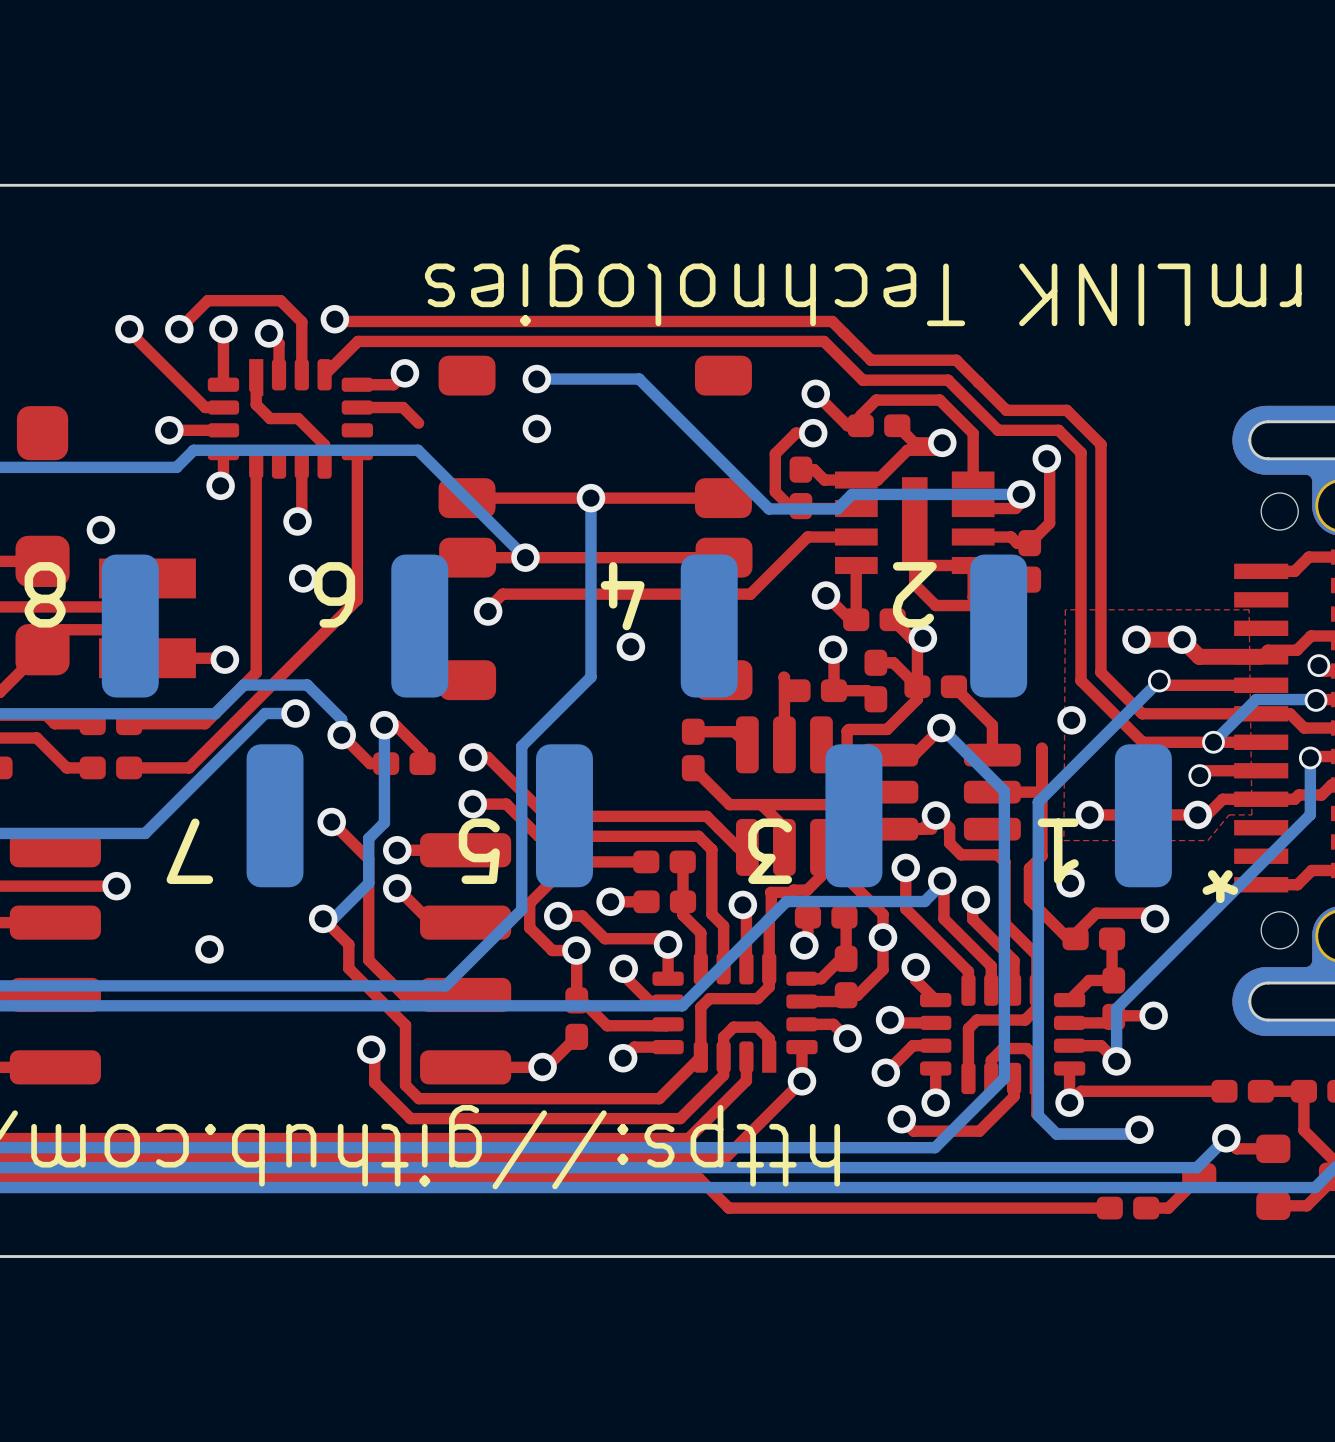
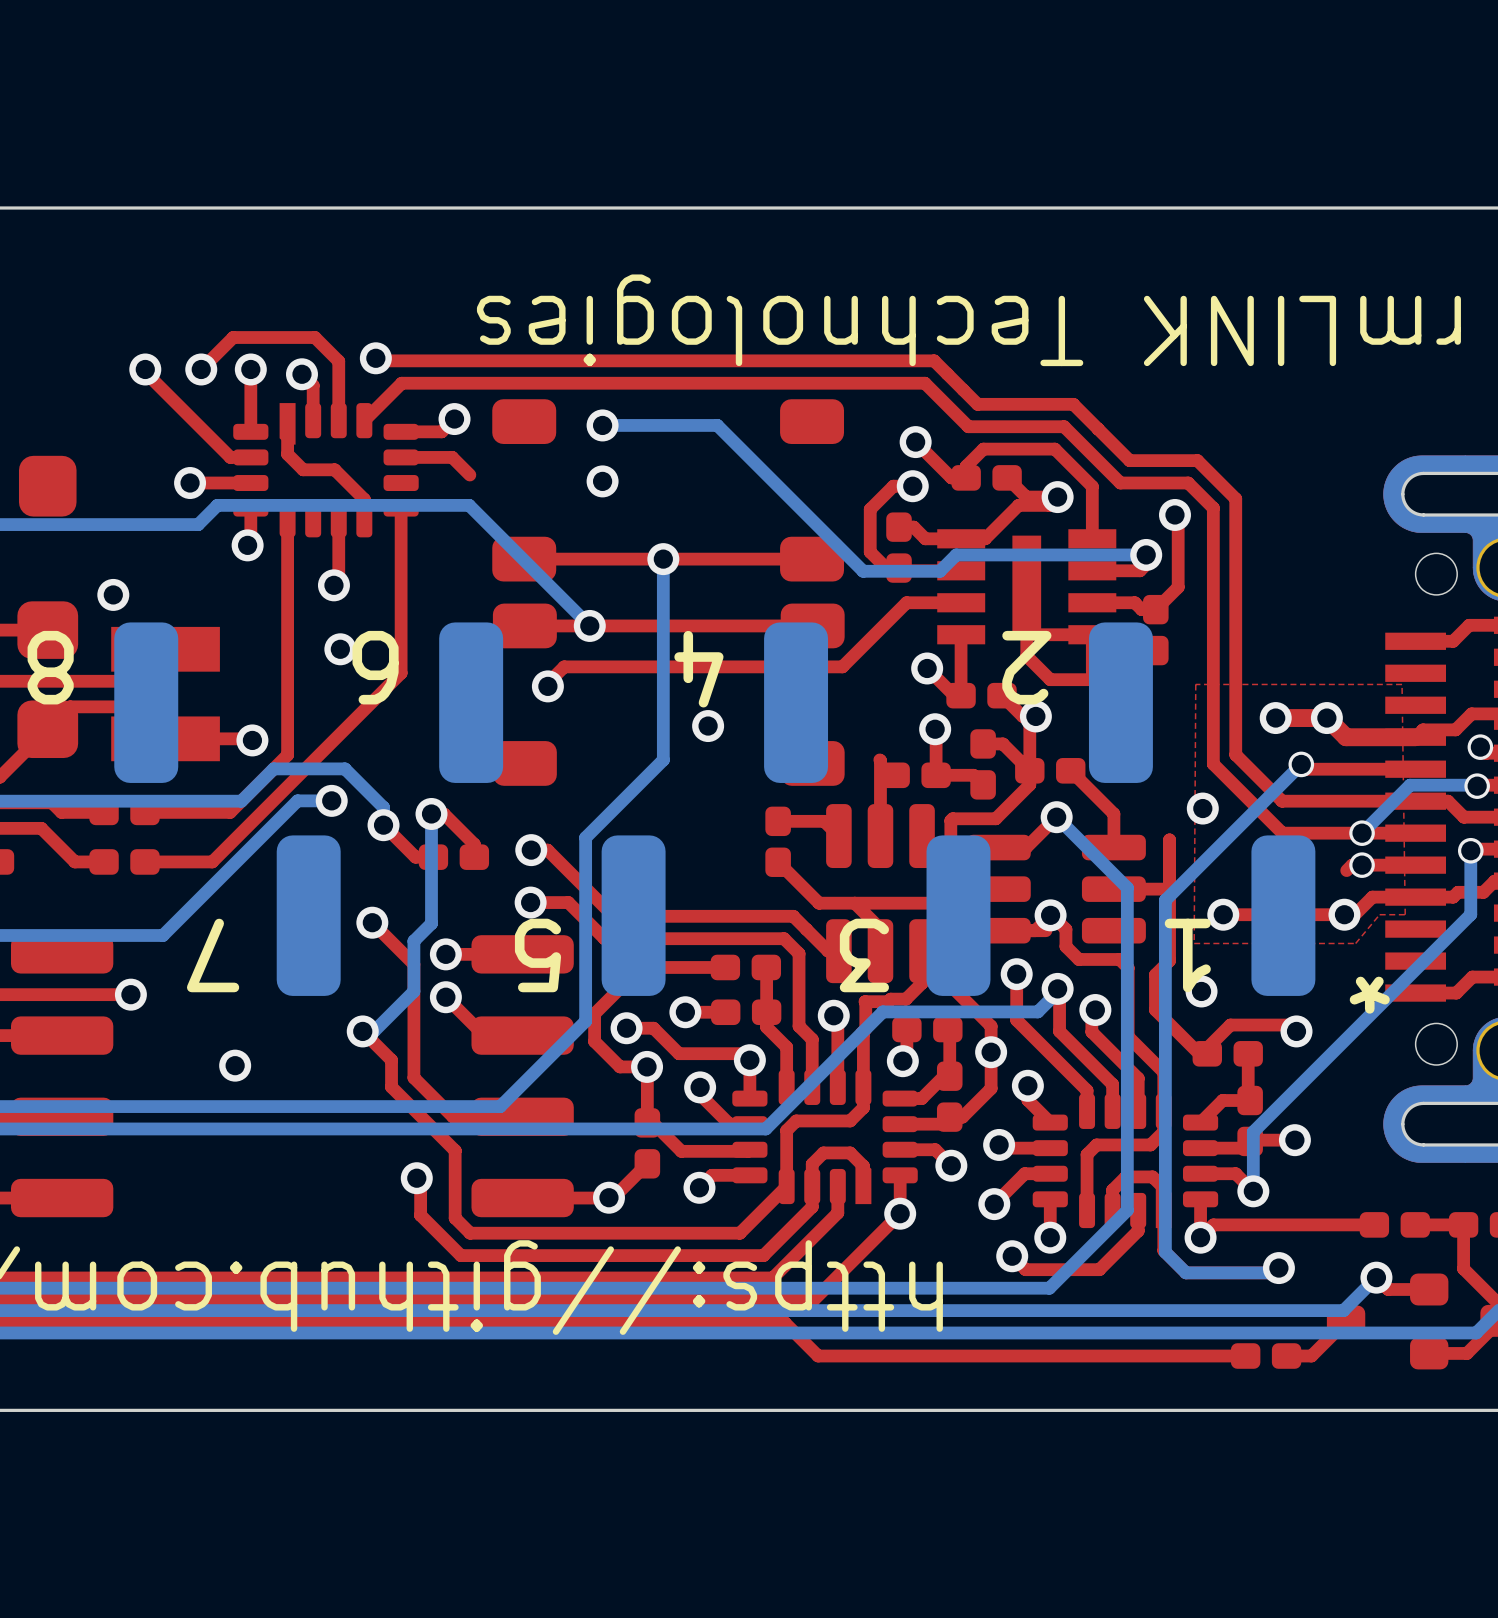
via position: (1199, 775) -> (1362, 865)

